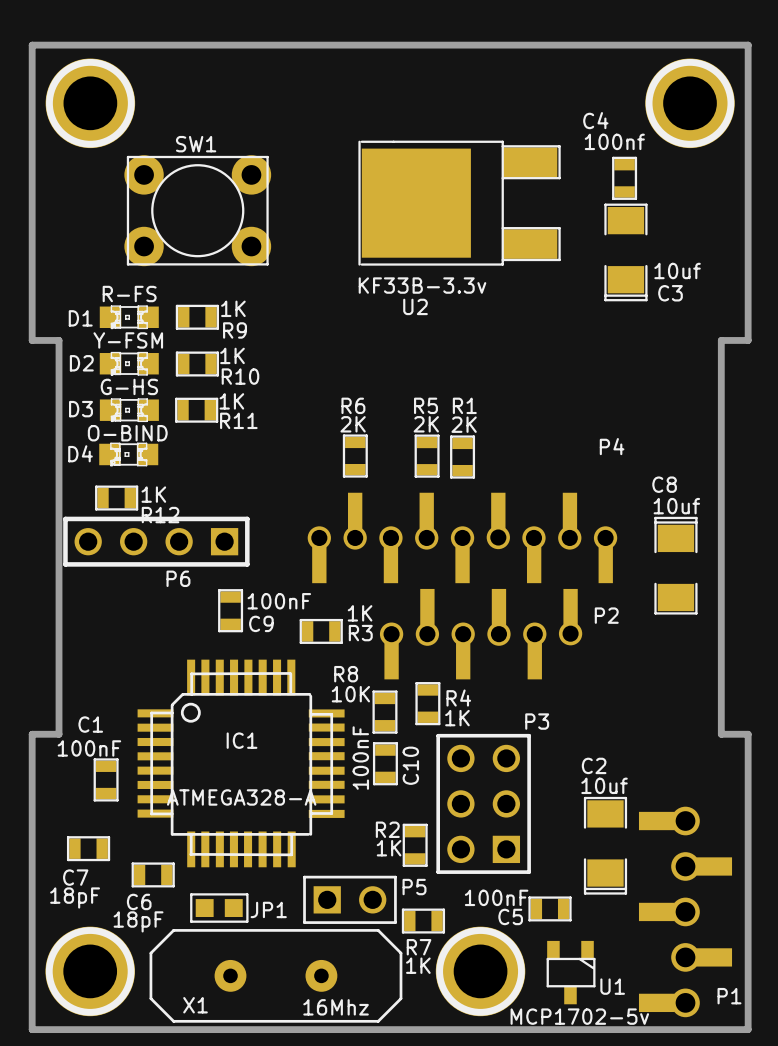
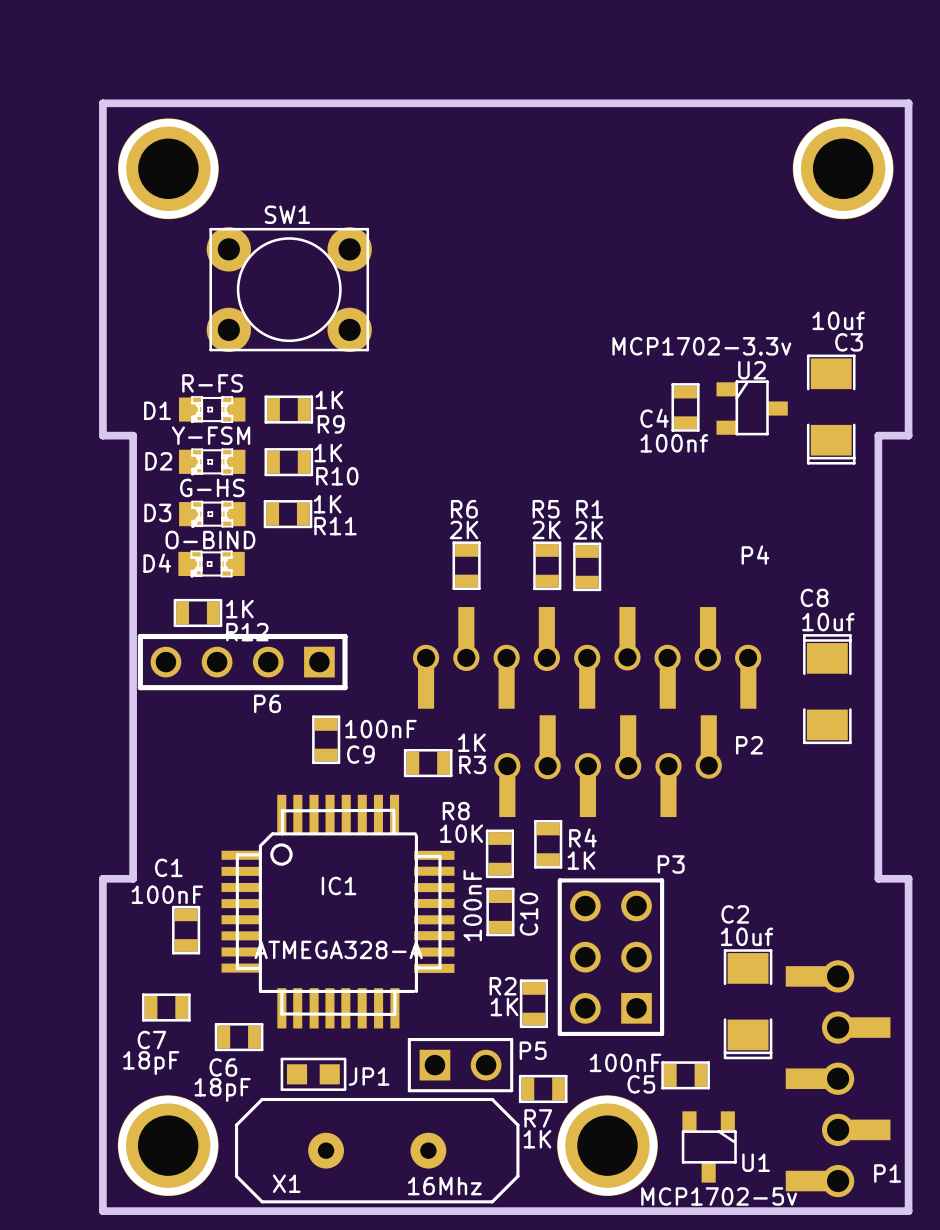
C4 name position: C4 (595, 120) -> C4 (654, 418)
U2 footprint: [358, 140, 561, 266] -> [716, 380, 788, 436]
C4 value position: 100nf (614, 141) -> 100nf (674, 443)
C4 position: (624, 178) -> (685, 407)
C3 position: (625, 252) -> (831, 409)
C3 value position: 10uf (677, 271) -> 10uf (838, 320)
U2 value: KF33B-3.3v (422, 285) -> MCP1702-3.3v (701, 346)
C3 name position: C3 (670, 293) -> C3 (849, 342)
U2 name position: U2 (415, 306) -> U2 (752, 370)

